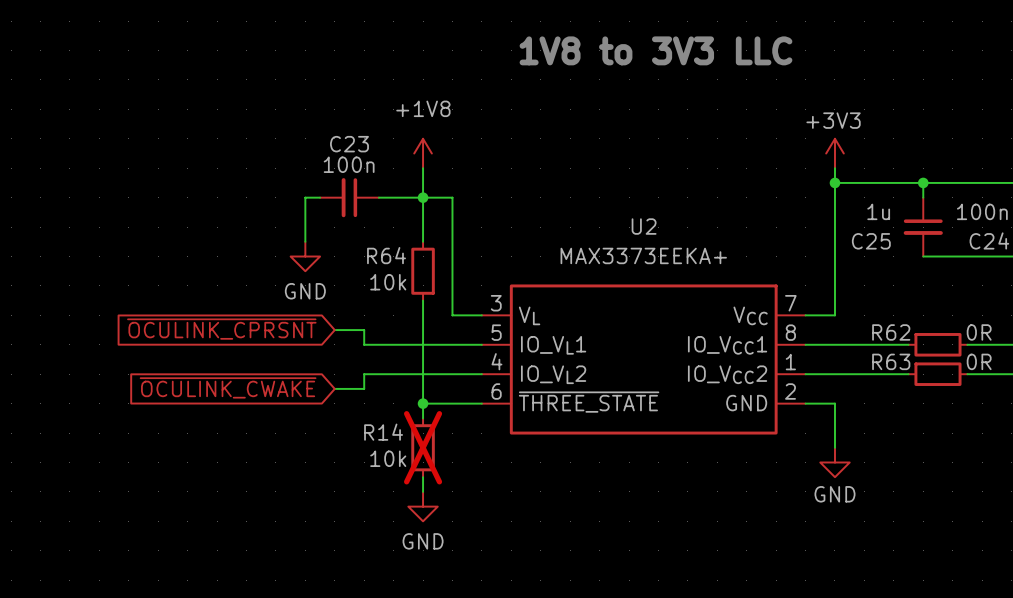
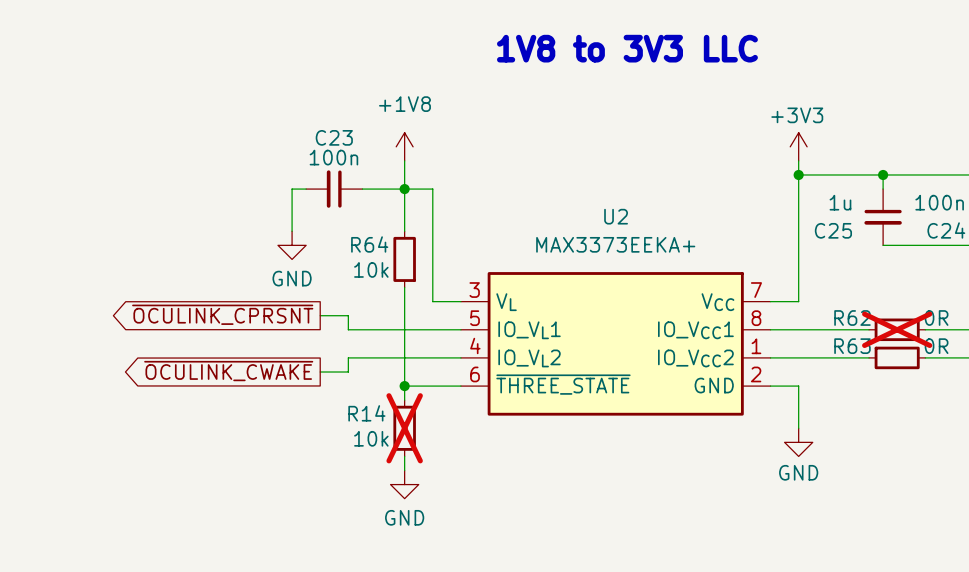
global label shape: input (221, 329) -> output (222, 314)
R62 do-not-place cross: none -> (897, 329)
global label shape: input (228, 387) -> output (228, 371)

